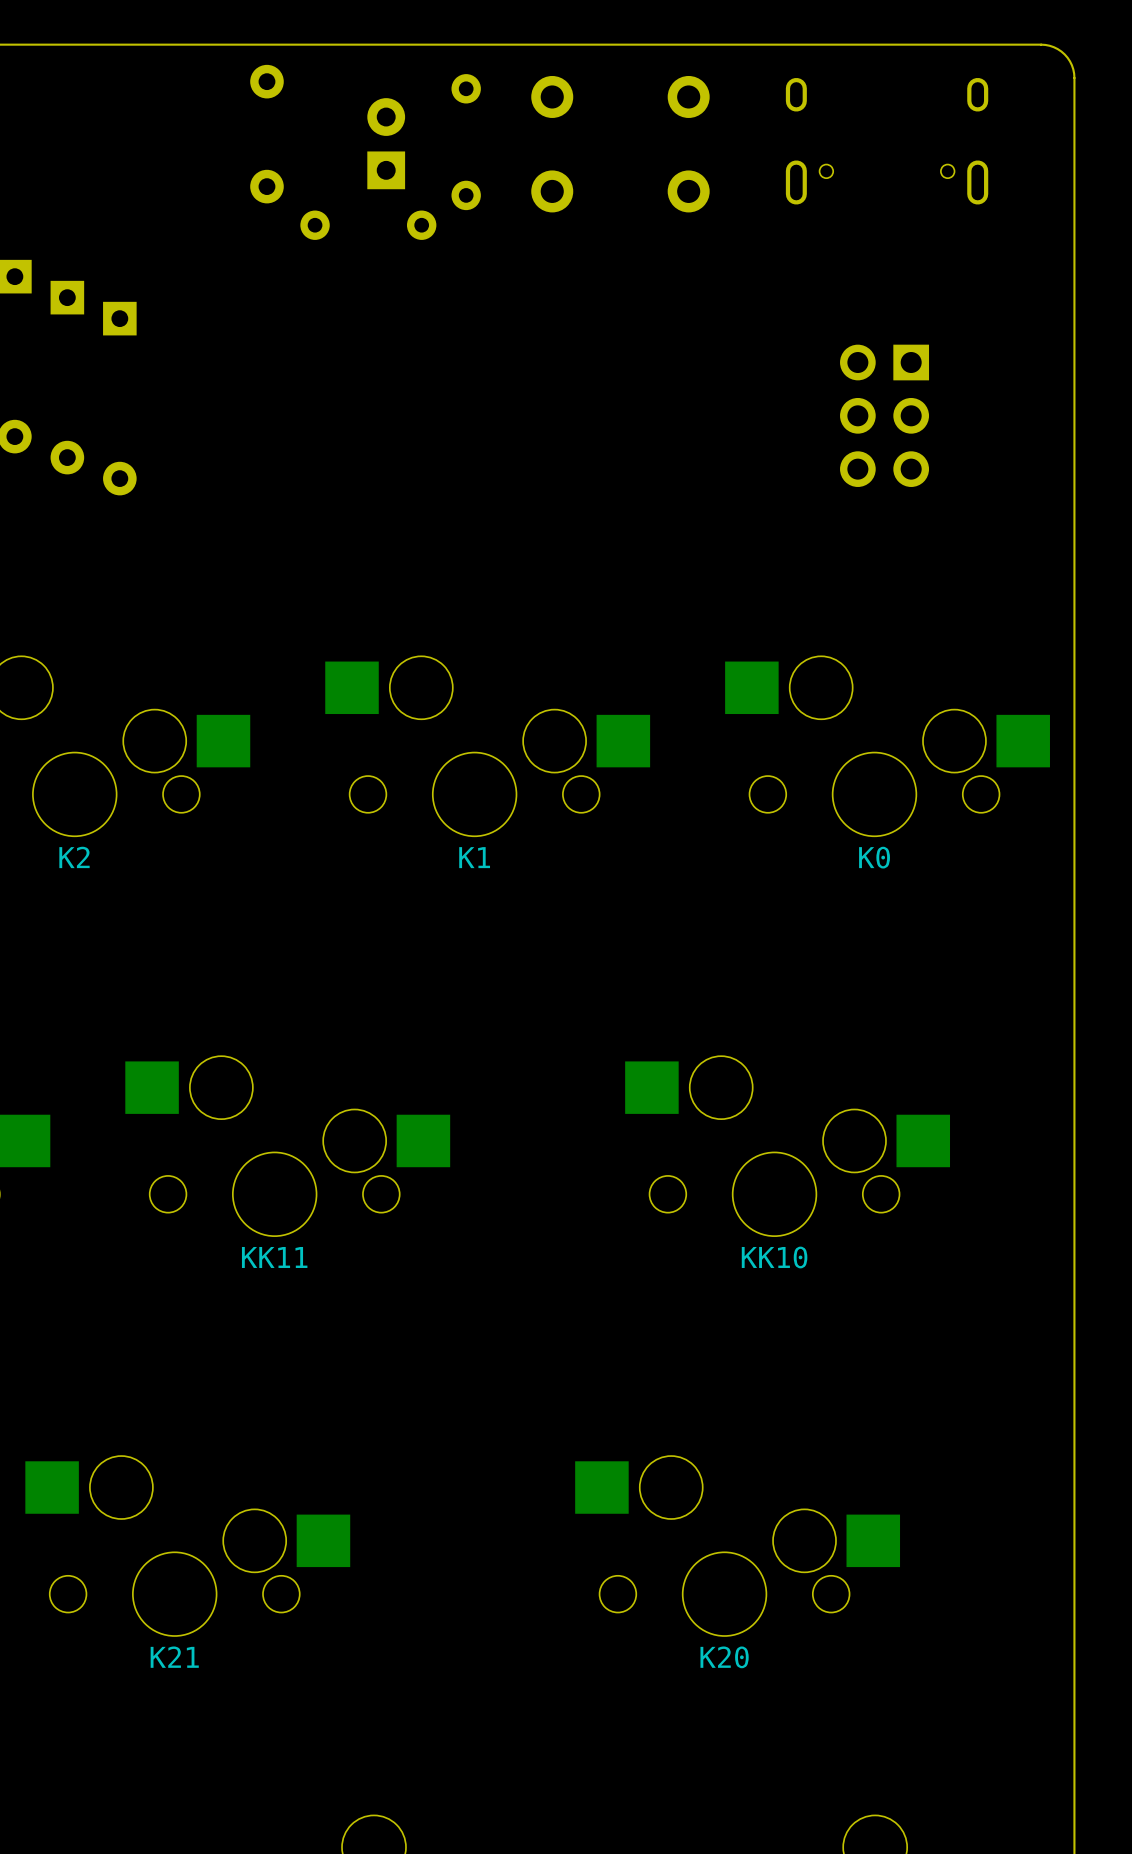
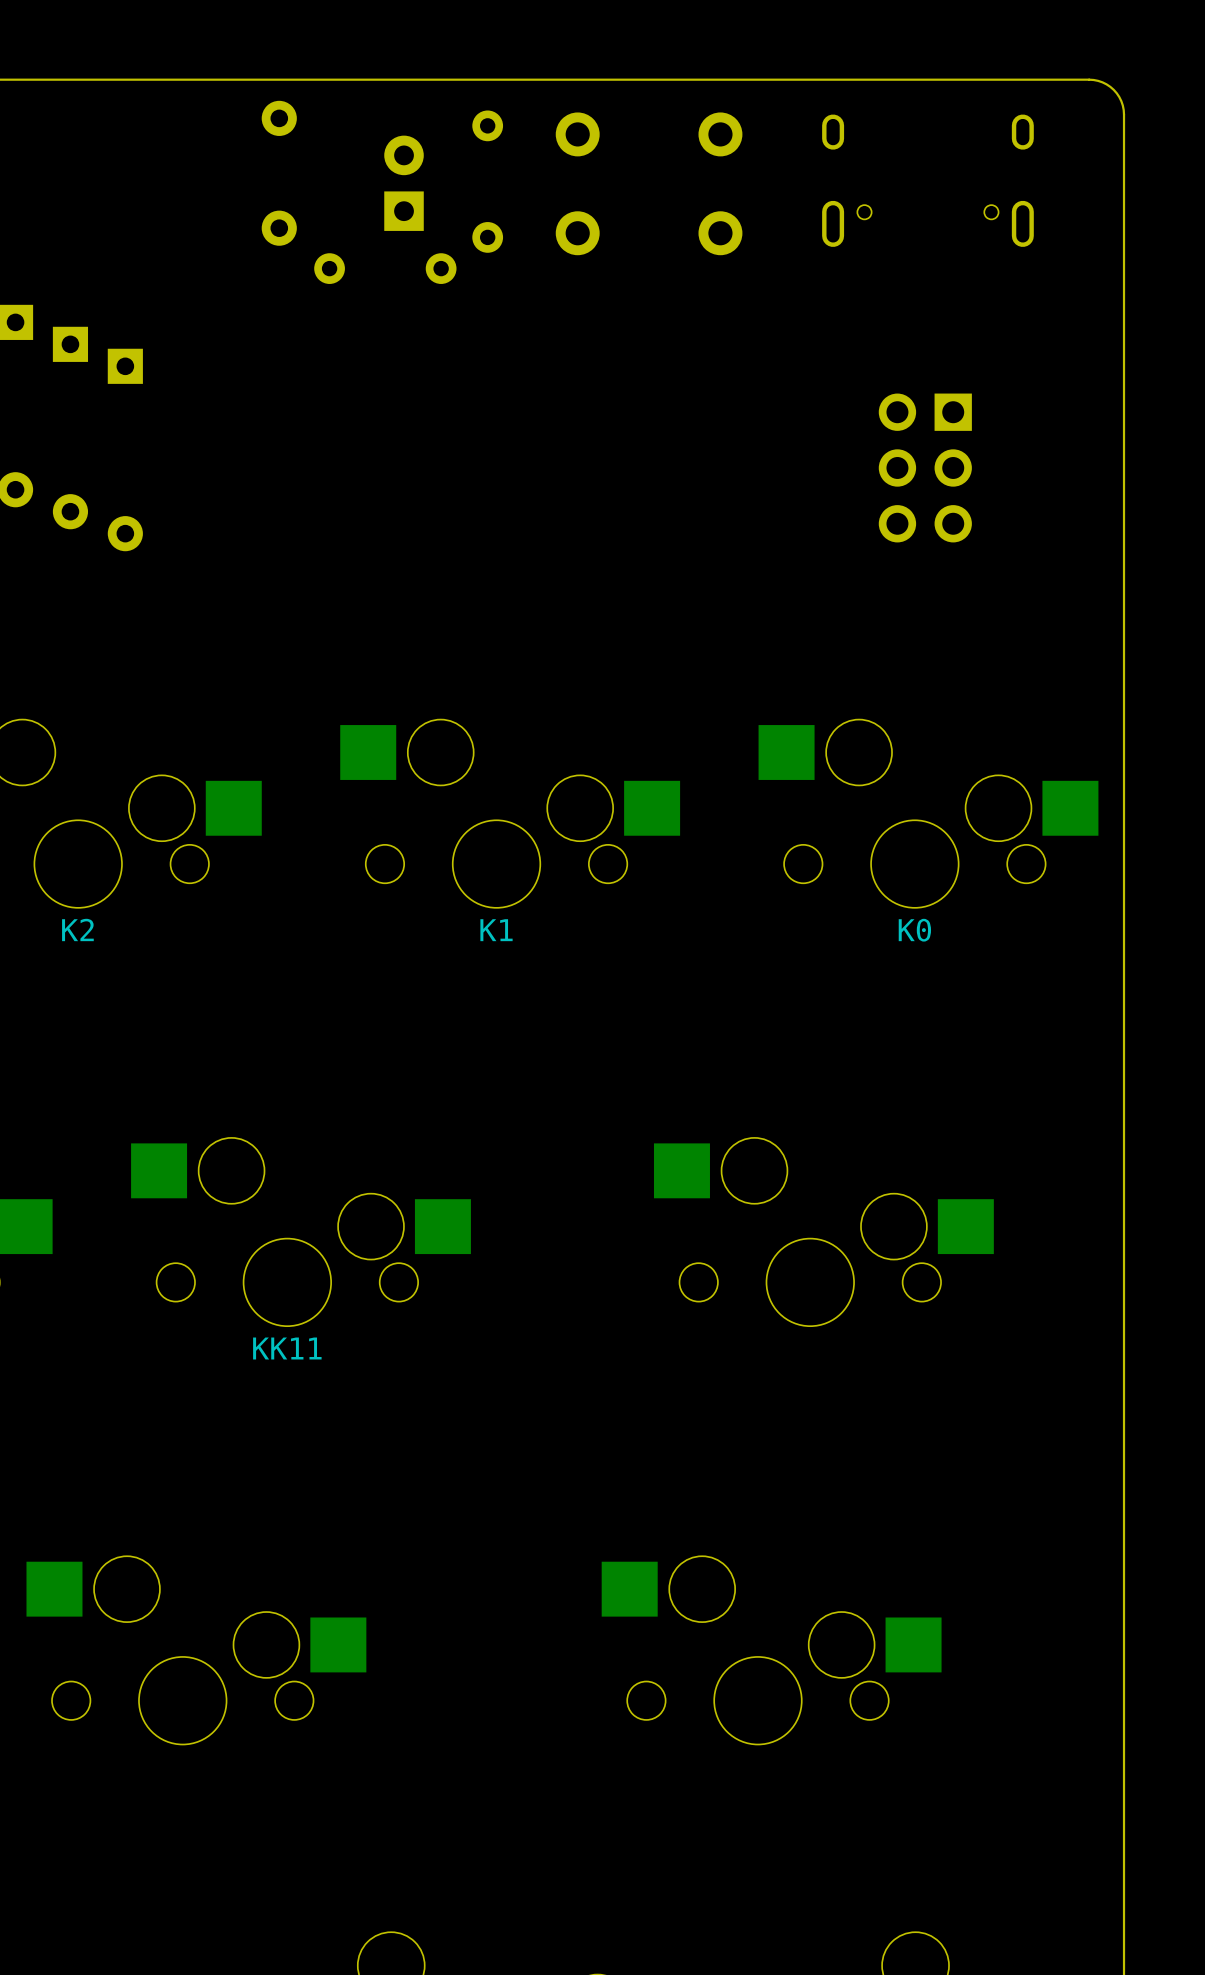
KK10 name: KK10 (774, 1257) -> none
K21 name: K21 (174, 1657) -> none
K20 name: K20 (724, 1657) -> none

